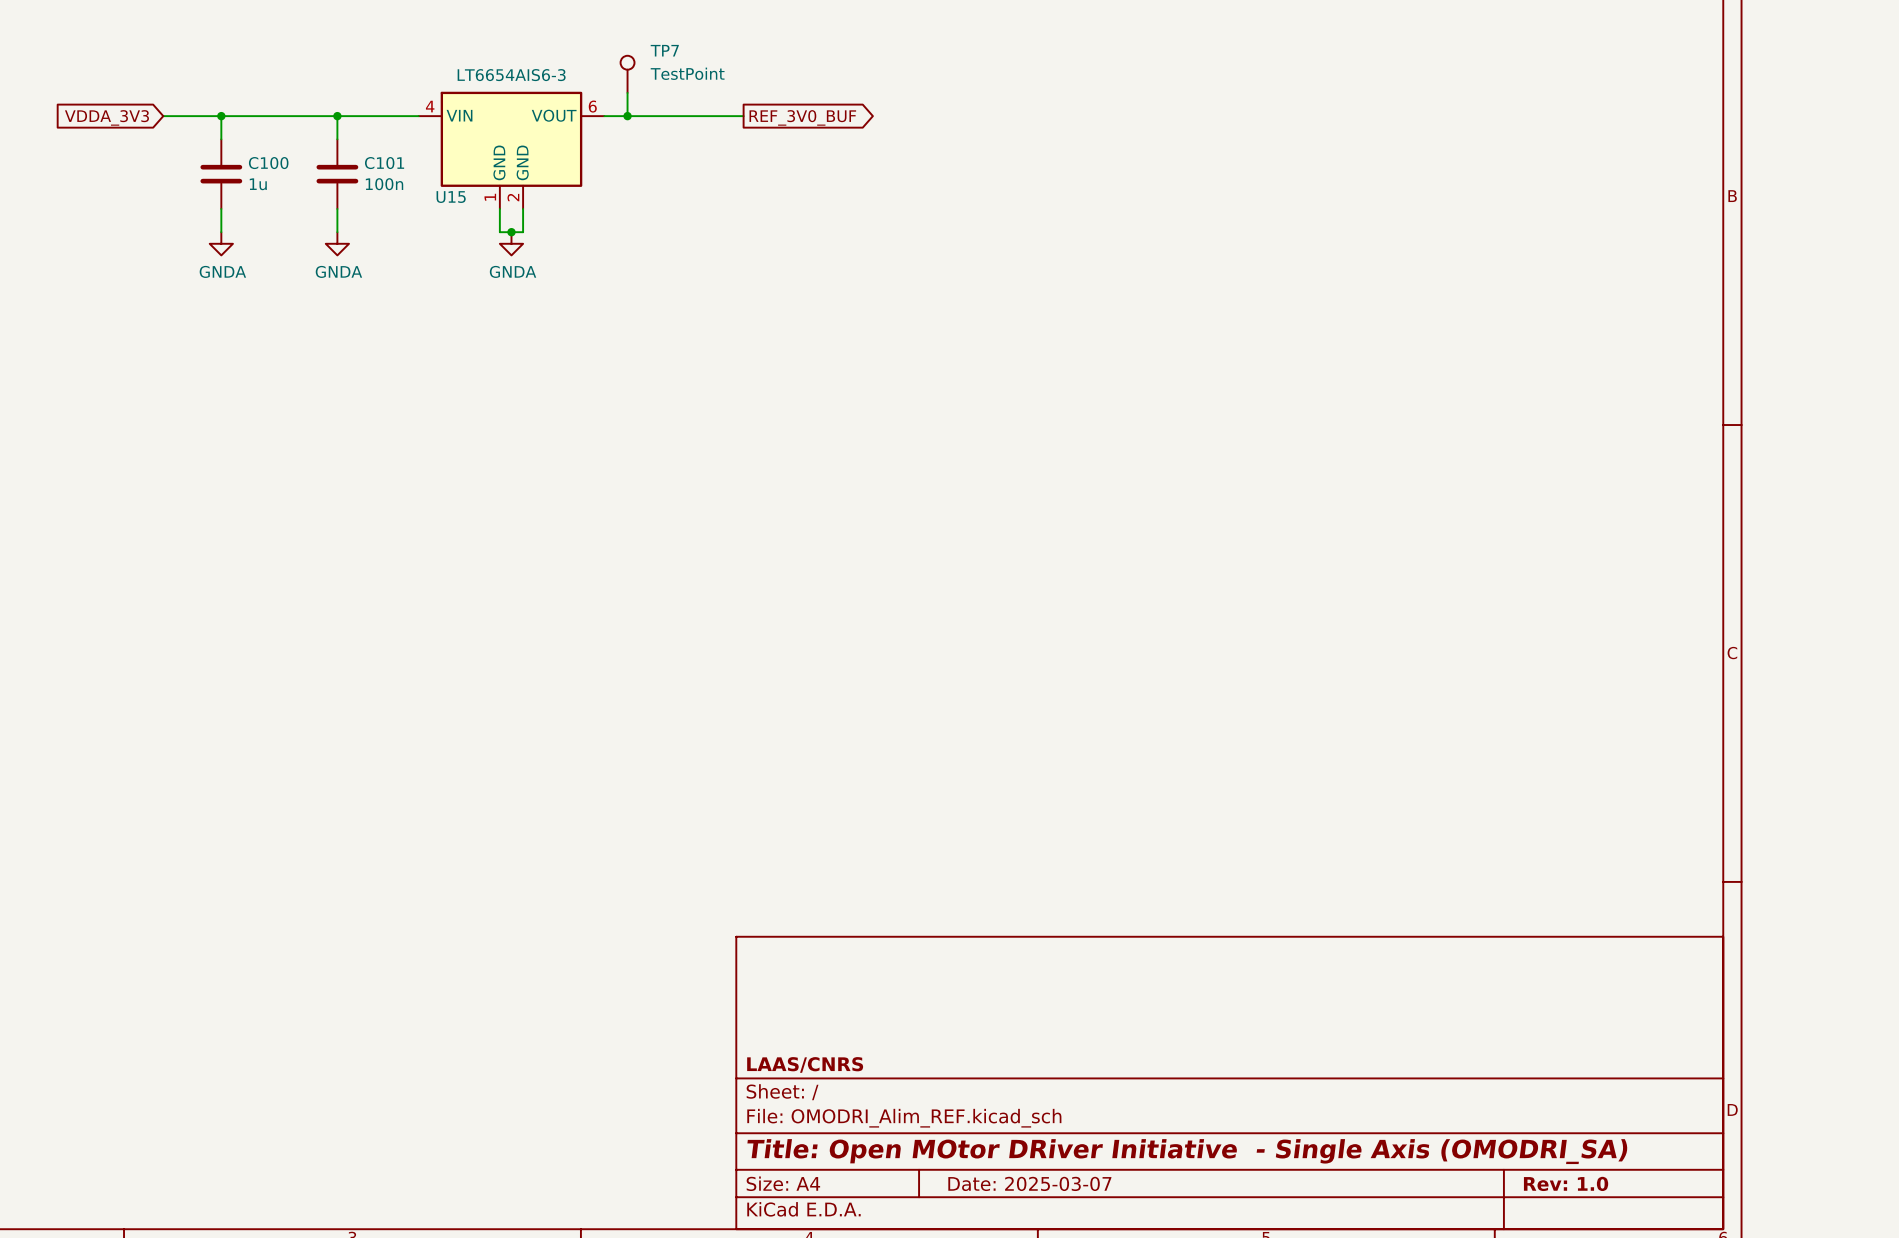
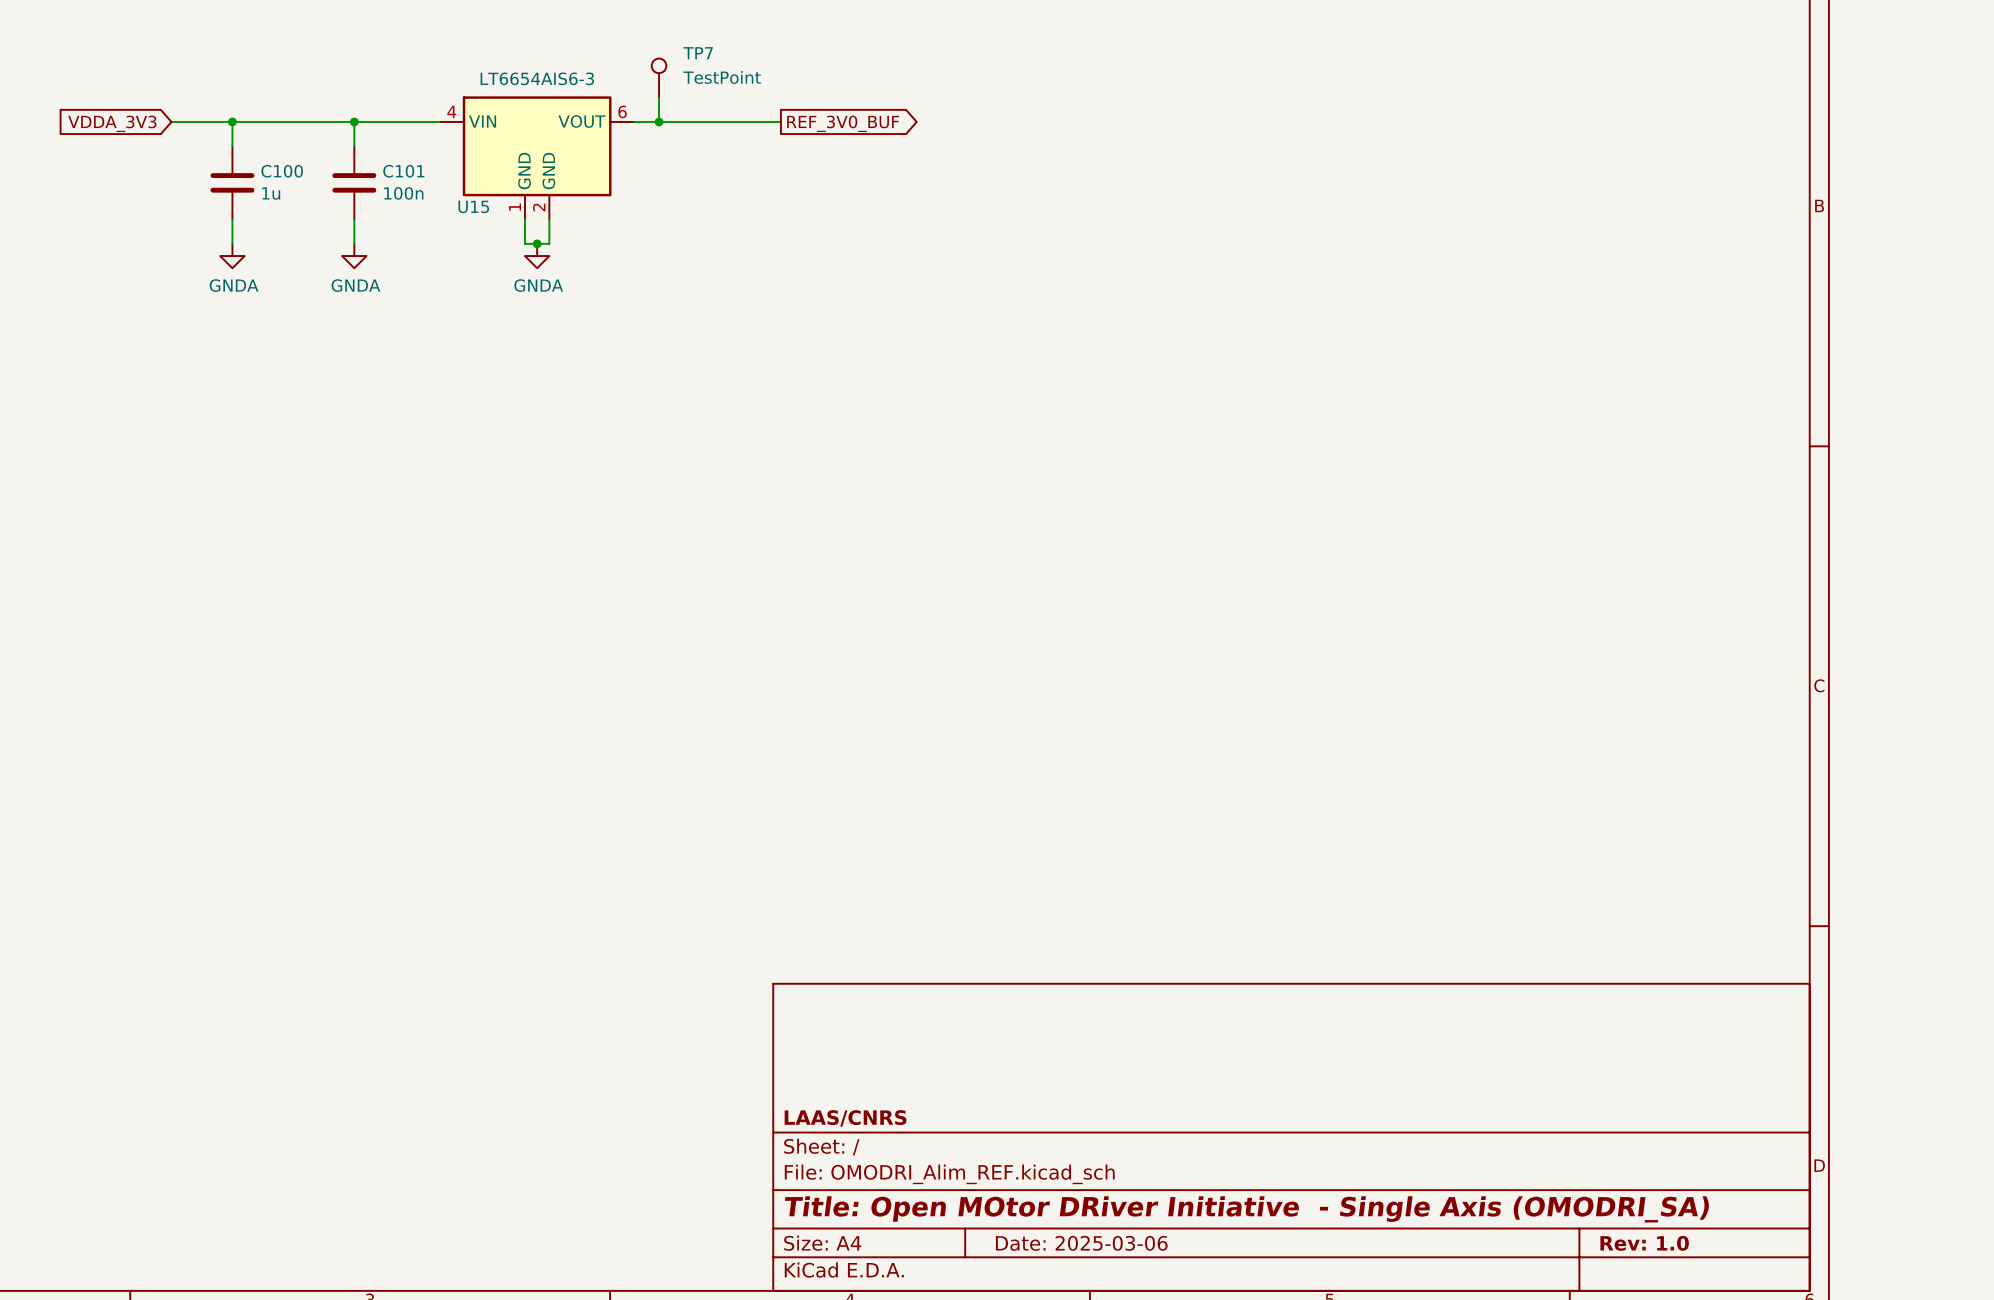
title block: Date: 2025-03-07 (1029, 1183) -> Date: 2025-03-06 (1081, 1243)

